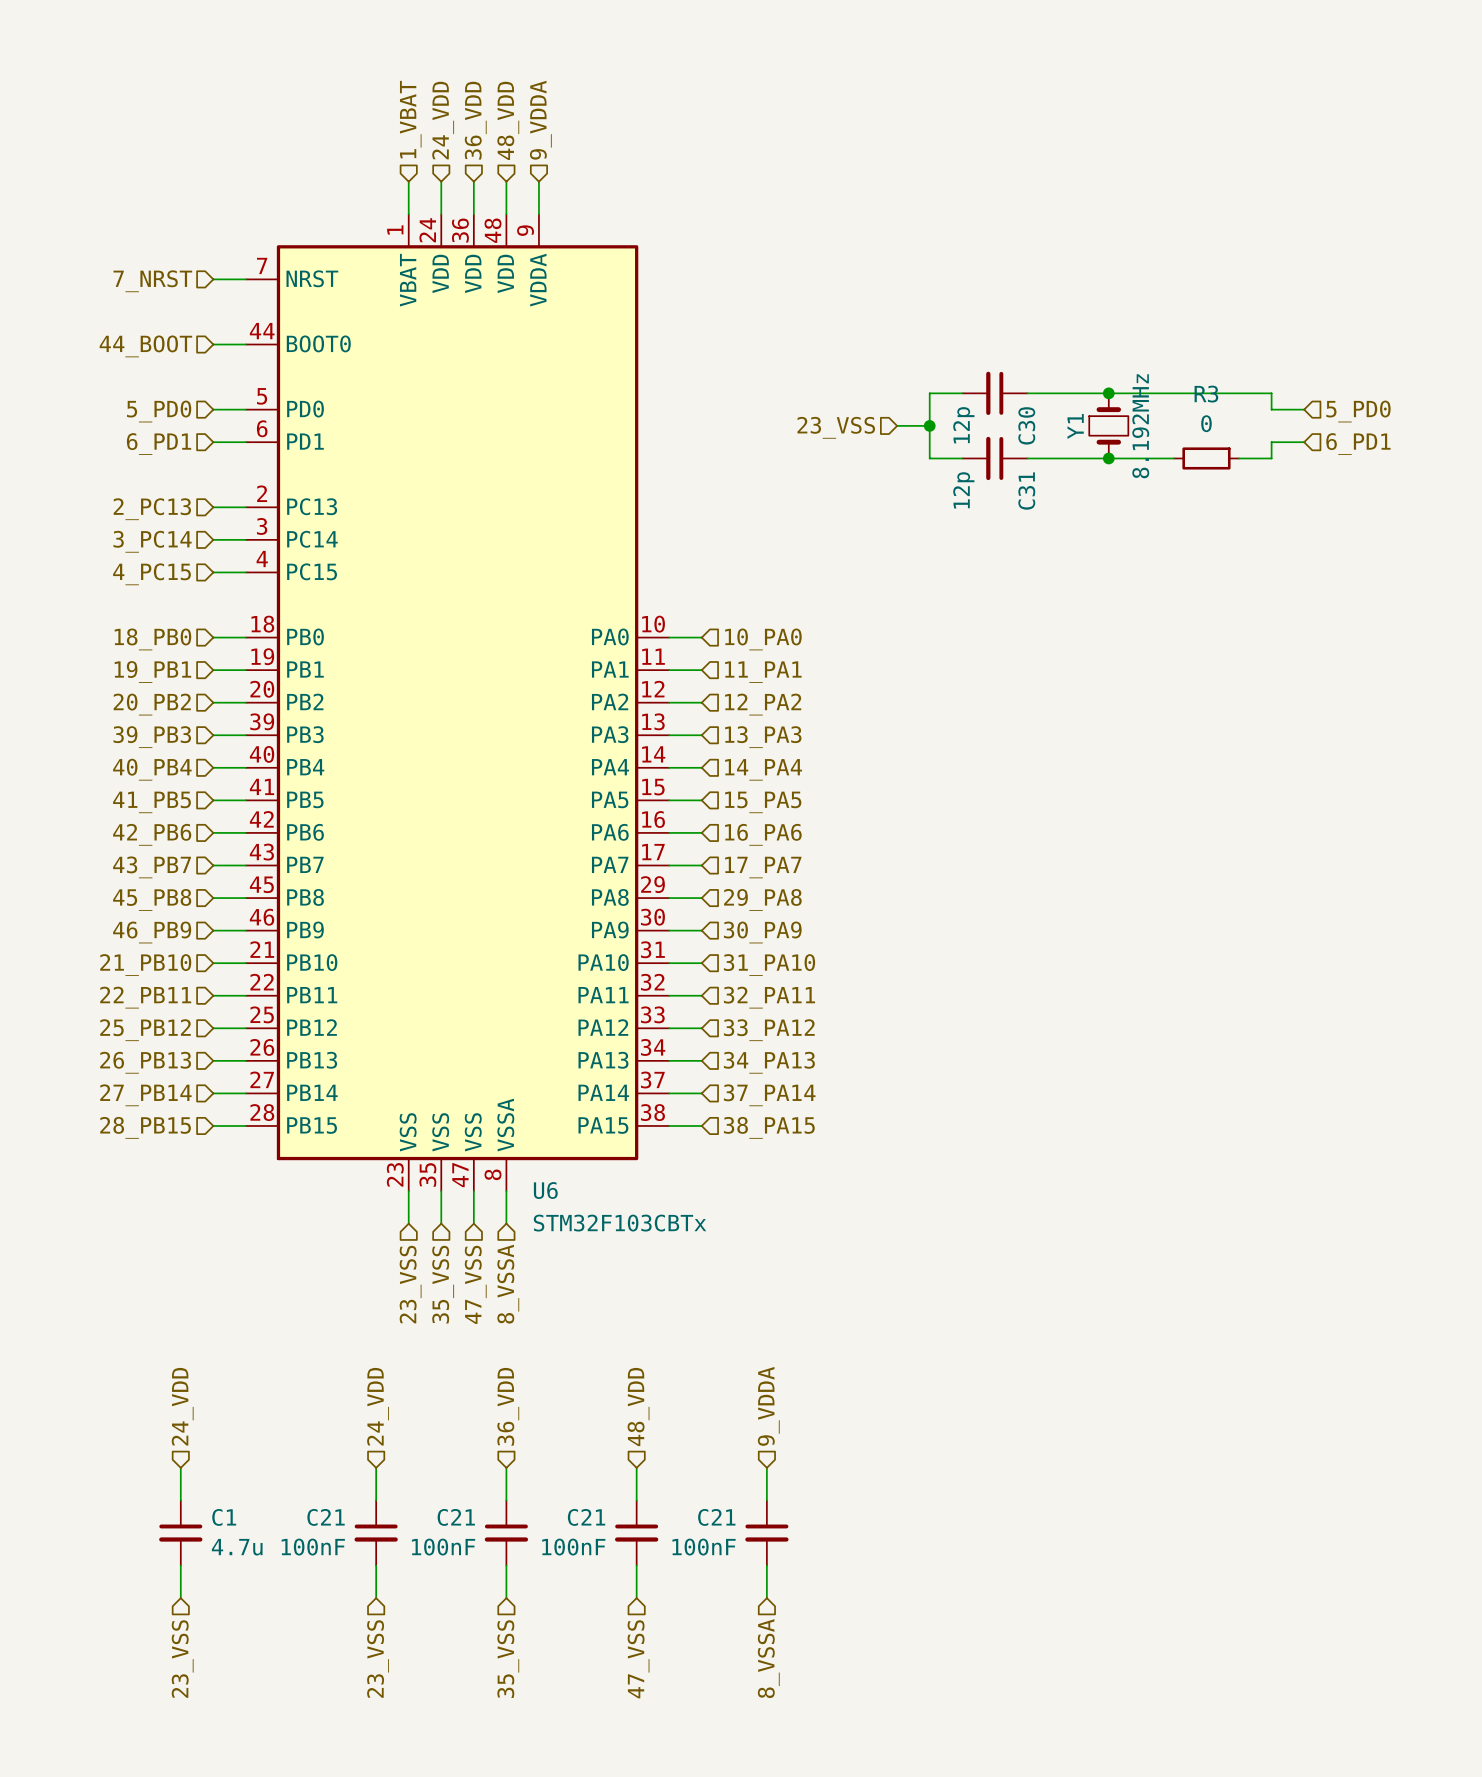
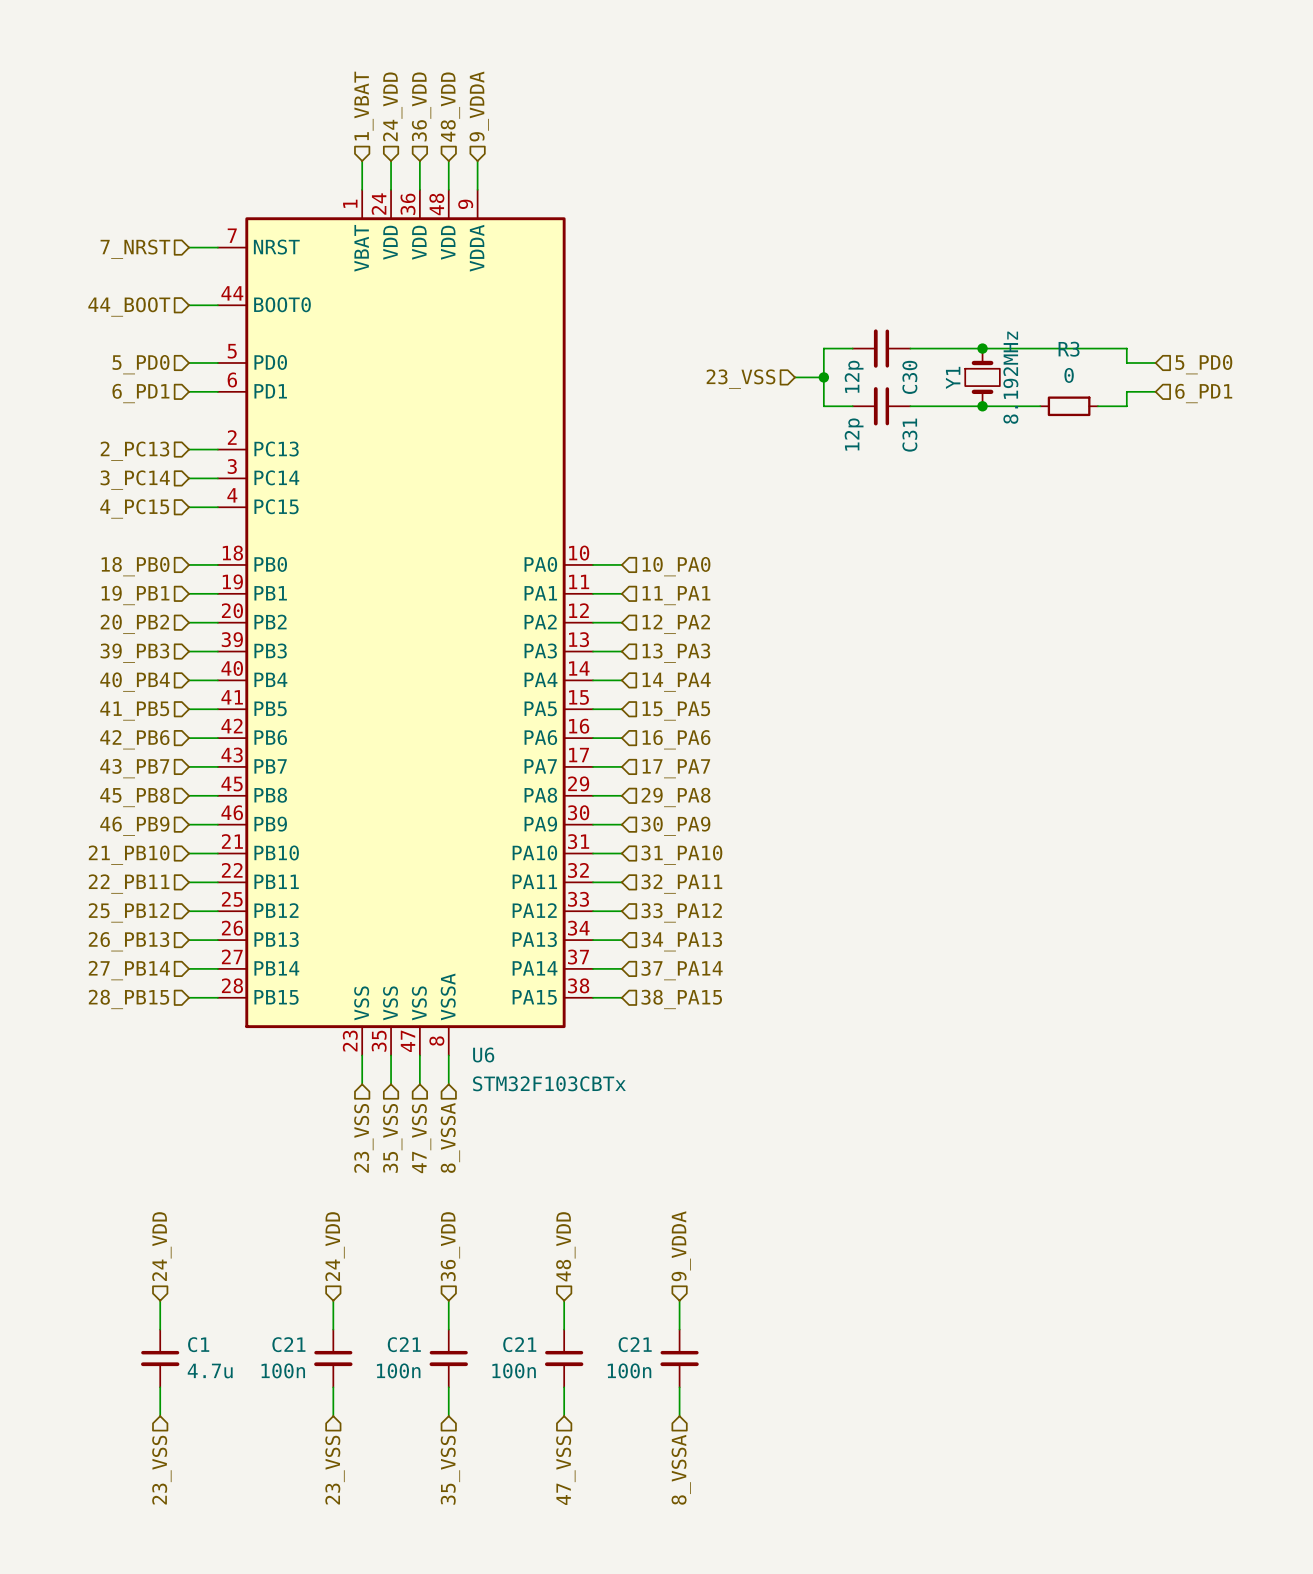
C21 value: 100nF (313, 1547) -> 100n (283, 1370)
C21 value: 100nF (443, 1547) -> 100n (398, 1370)
C21 value: 100nF (573, 1547) -> 100n (514, 1370)
C21 value: 100nF (704, 1547) -> 100n (629, 1370)

